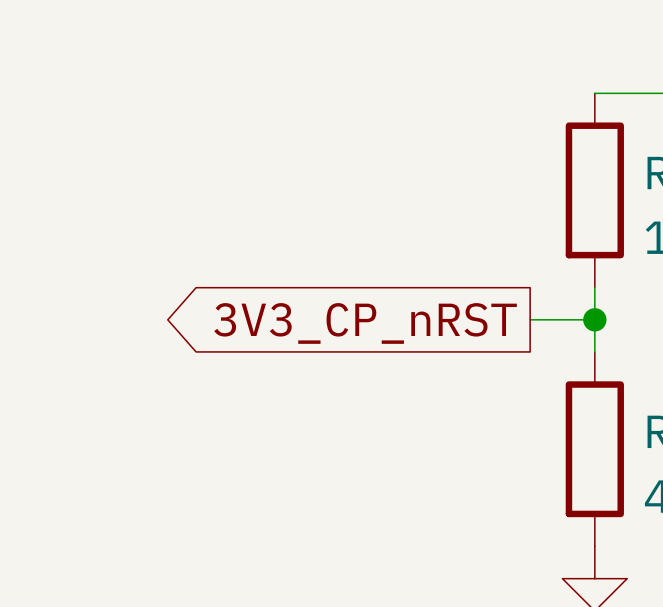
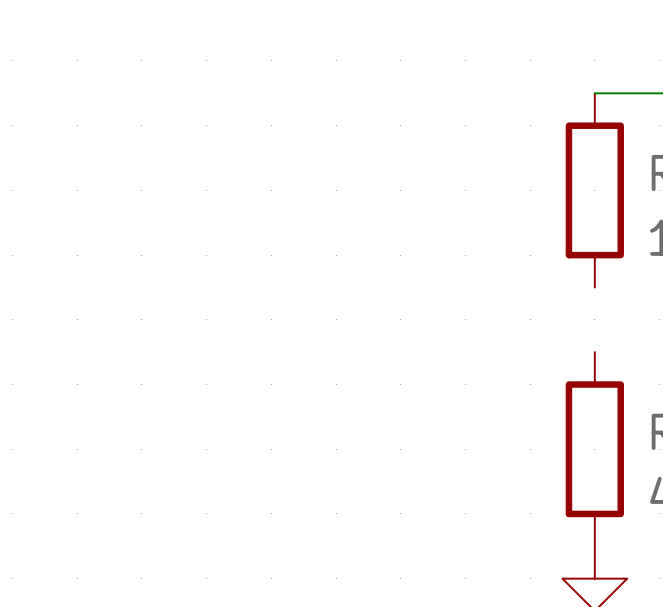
wire: (594, 287) (594, 352) -> none
wire: (530, 319) (594, 319) -> none
junction: (594, 319) -> none
global label: 3V3_CP_nRST (365, 323) -> none

